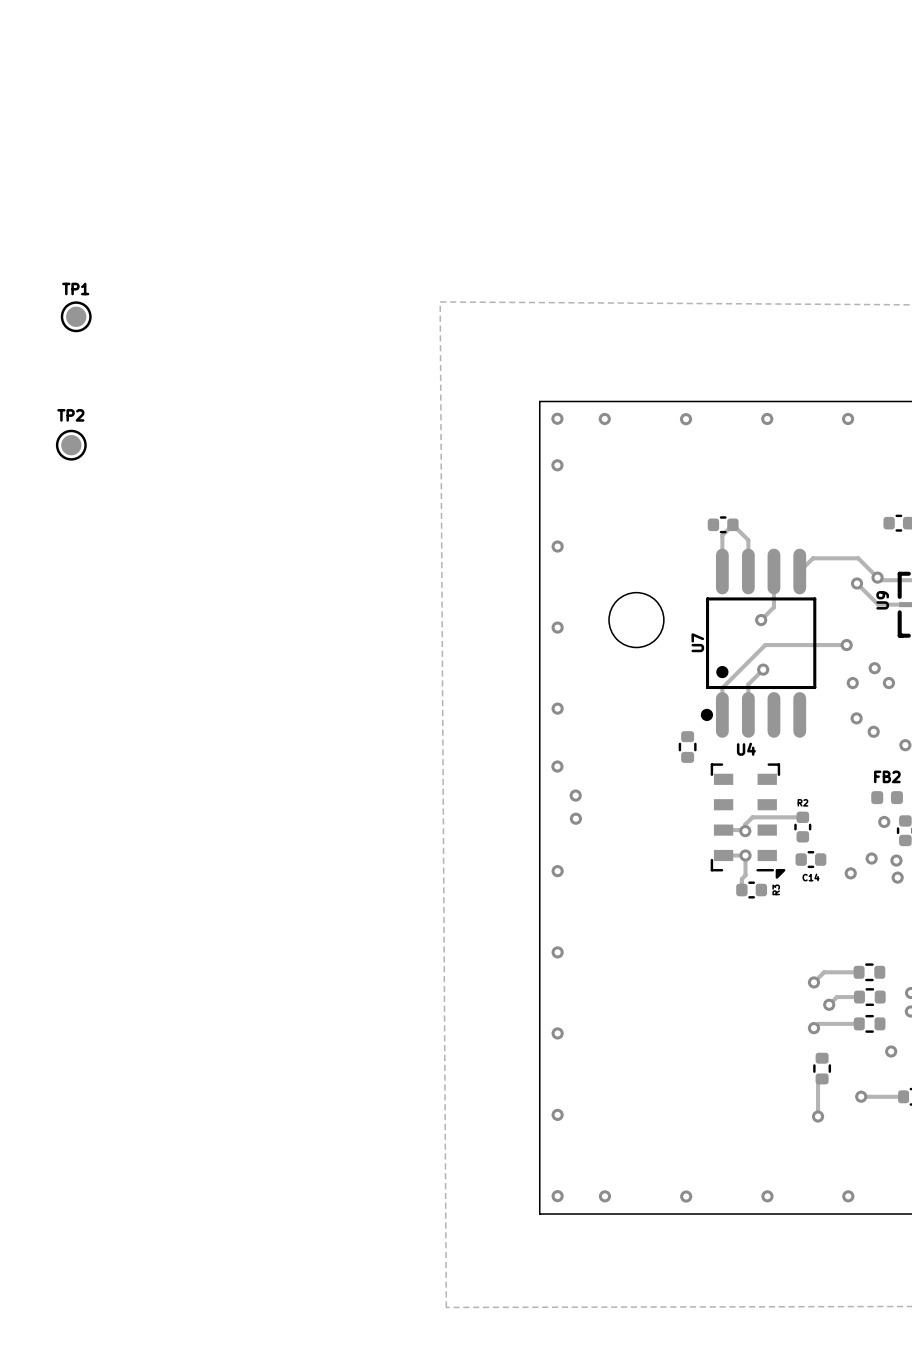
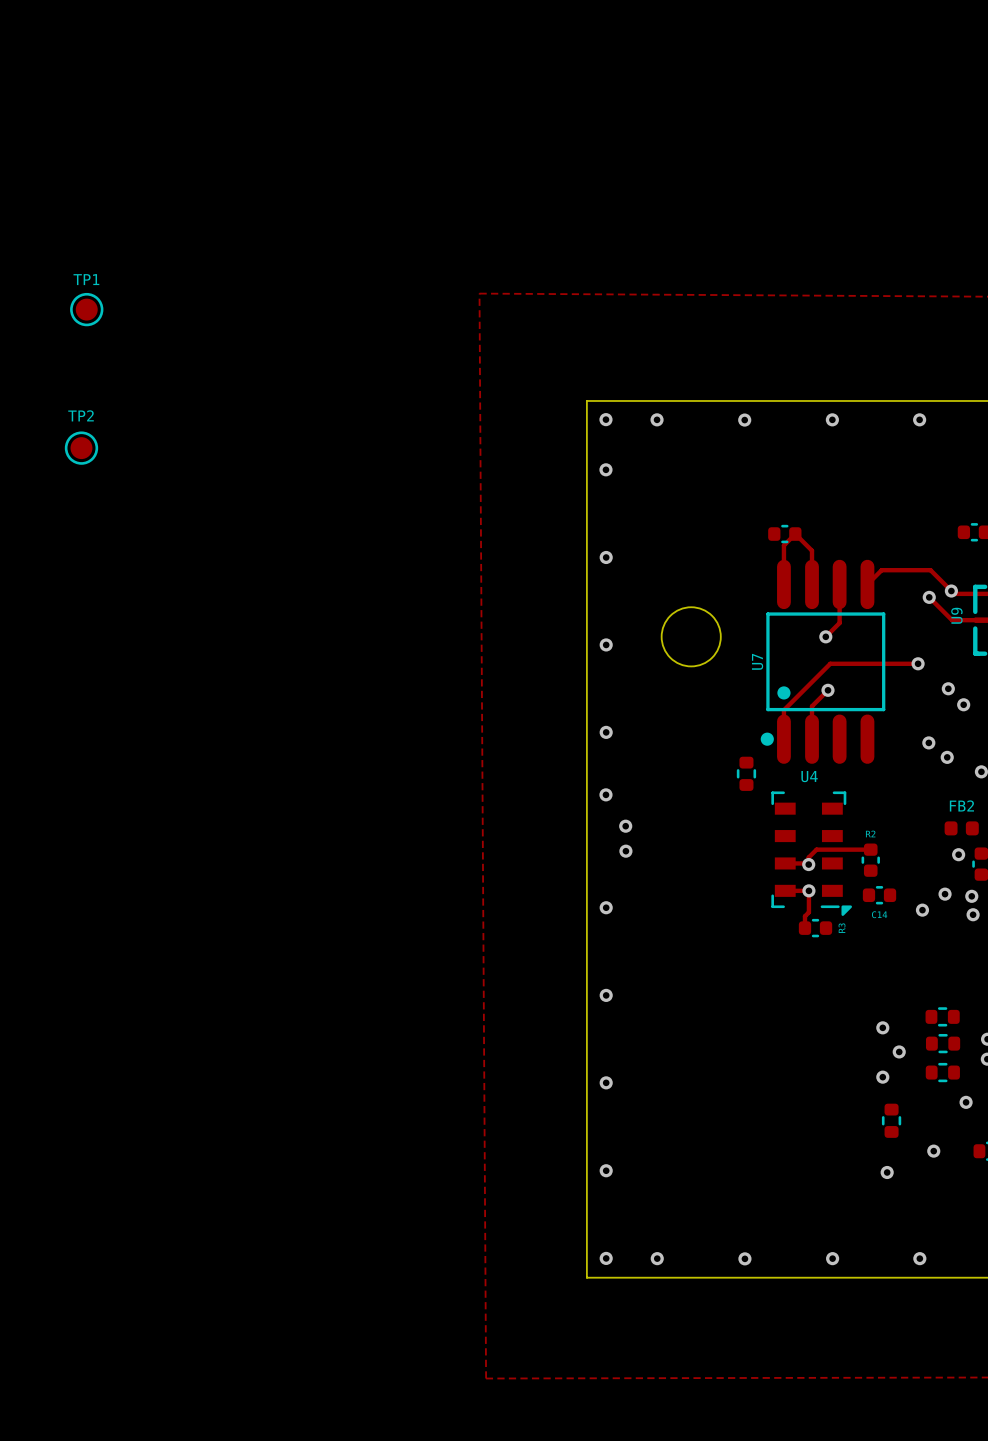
via: (852, 683) -> none
track: (859, 972) (824, 972) (813, 982) -> none
track: (859, 997) (836, 997) (829, 1004) -> none
track: (859, 1023) (818, 1023) (813, 1028) -> none
track: (822, 1078) (818, 1082) (818, 1116) -> none
track: (861, 1096) (903, 1096) -> none

